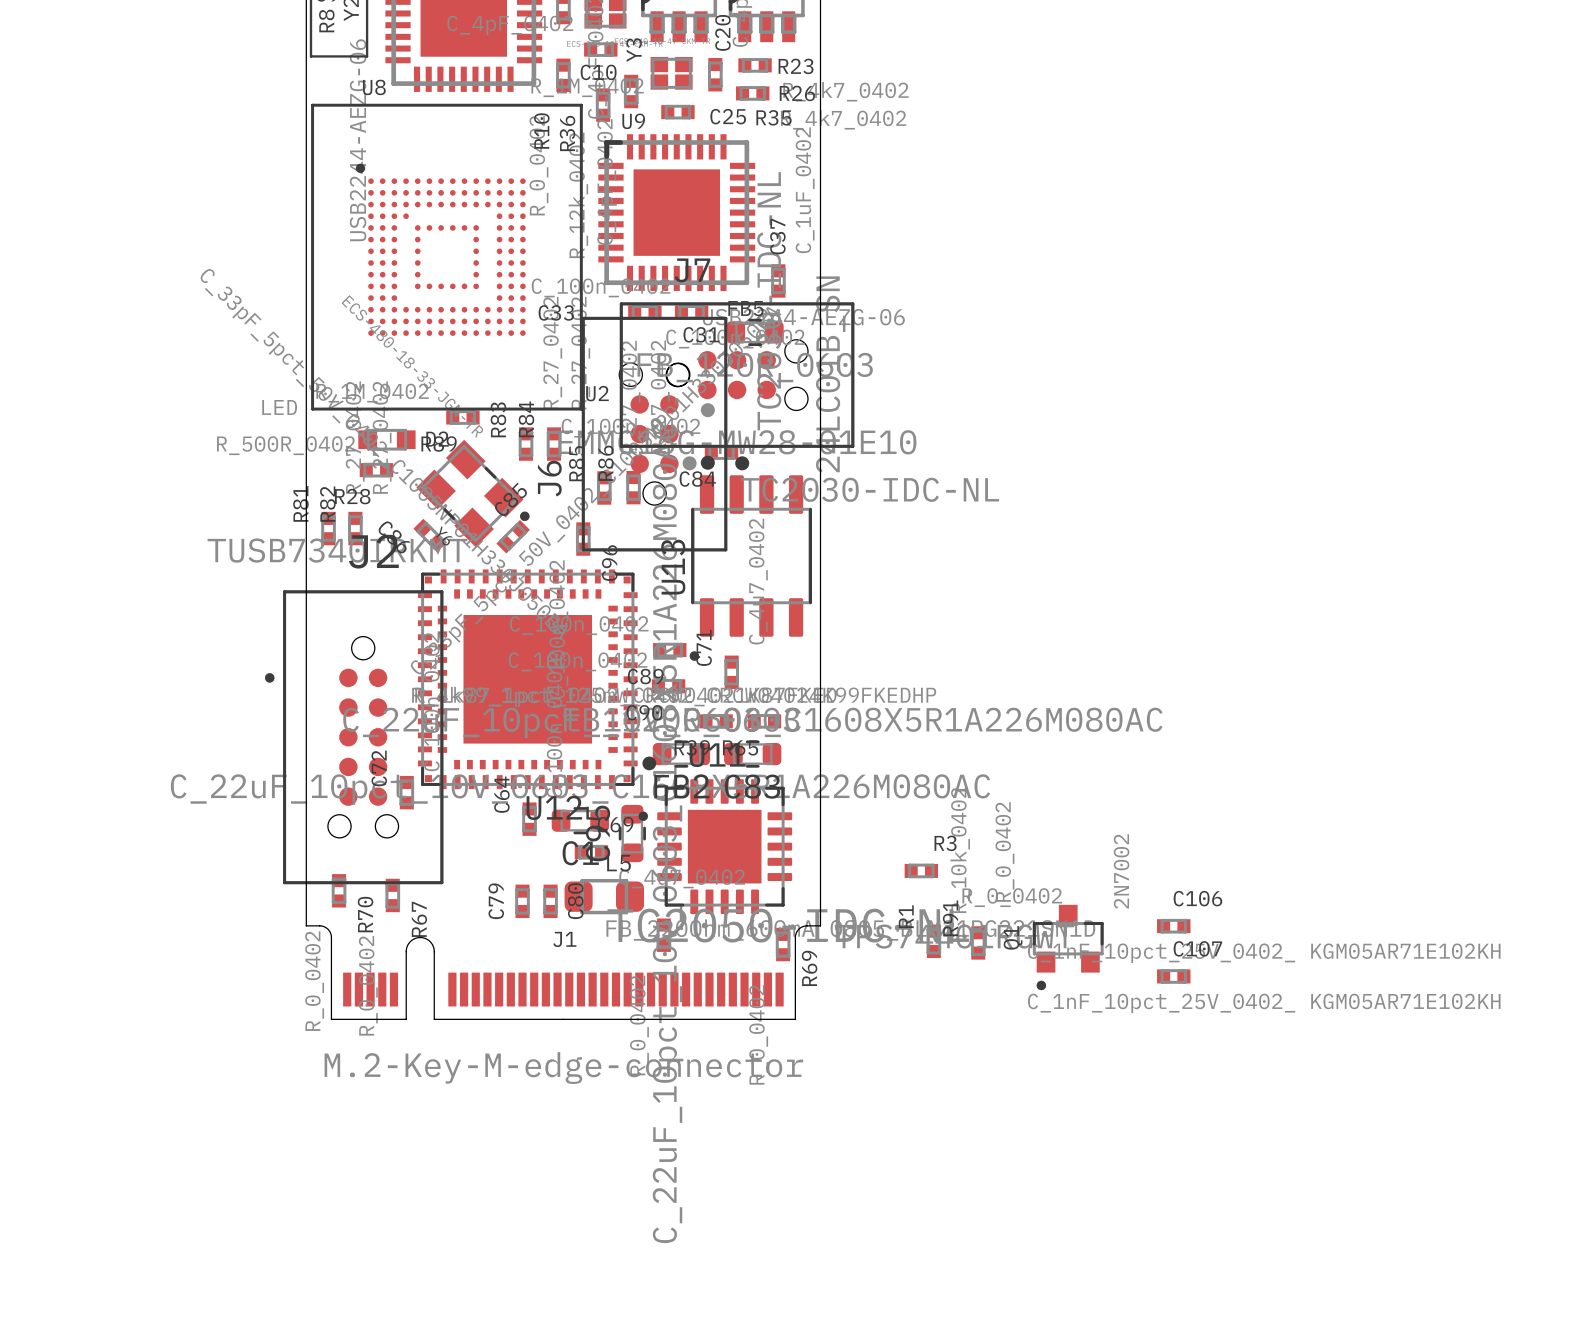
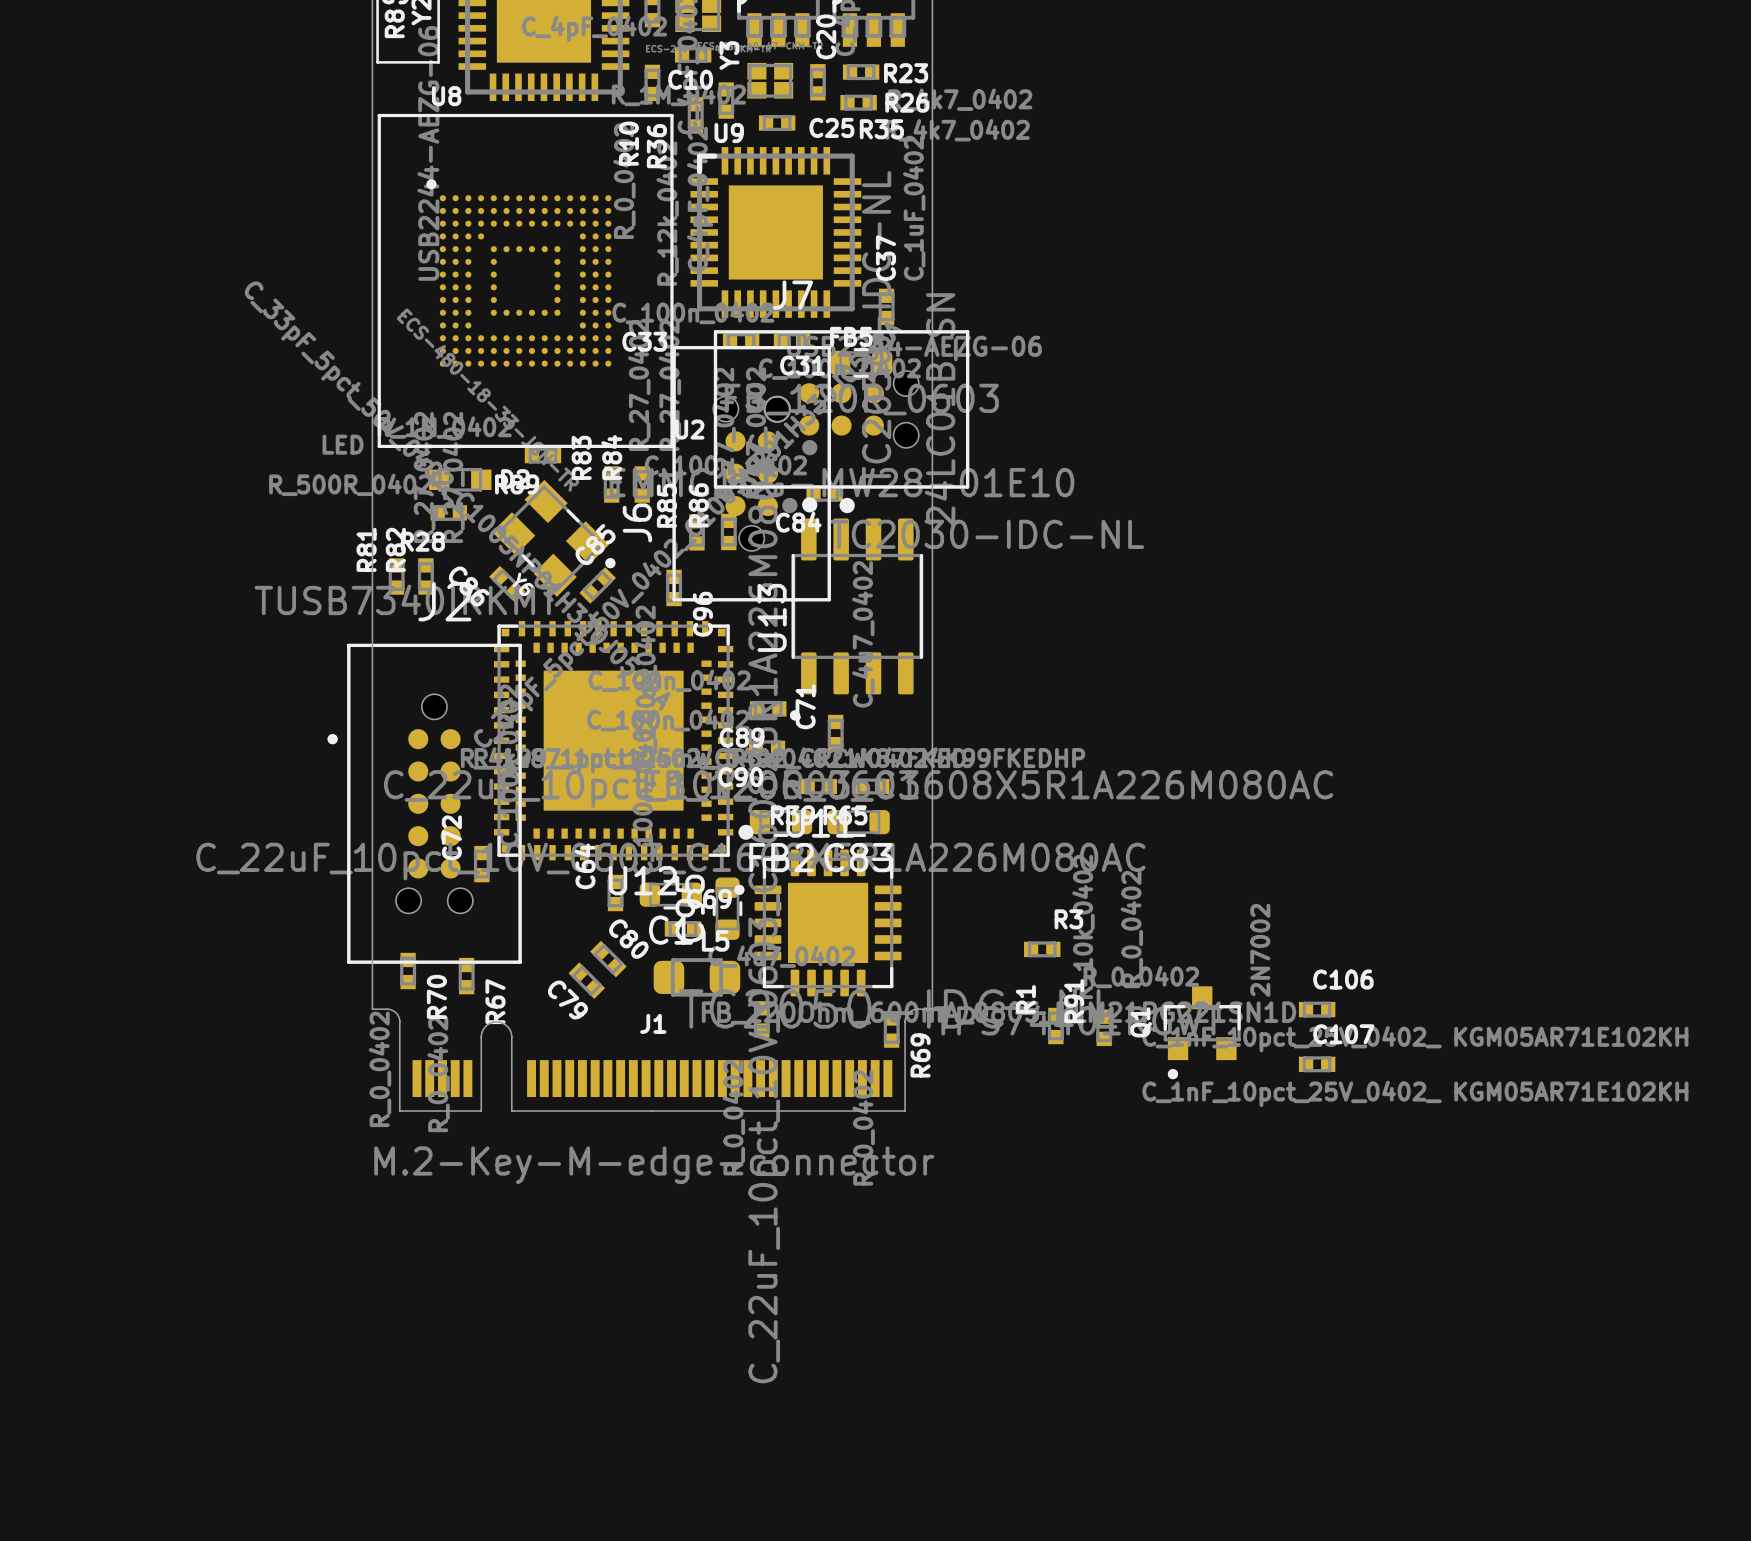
C79 rotation: 0° (522, 901) -> 45° counterclockwise (586, 980)
C80 rotation: 0° (550, 901) -> 45° counterclockwise (608, 959)
C80 position: (550, 901) -> (608, 959)

